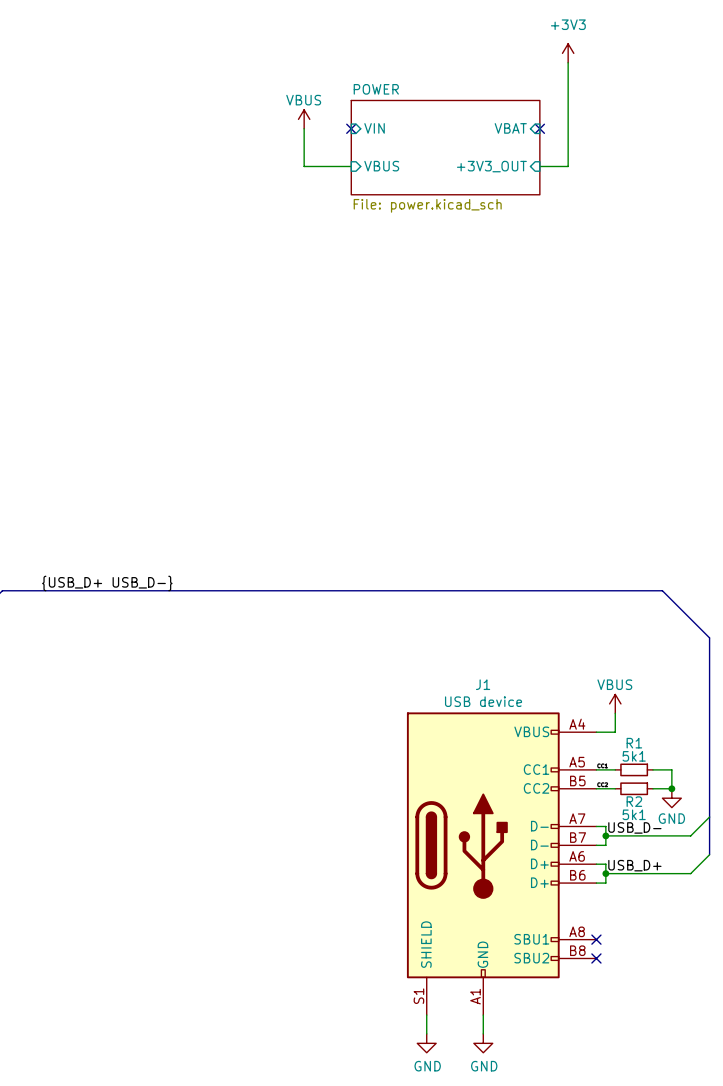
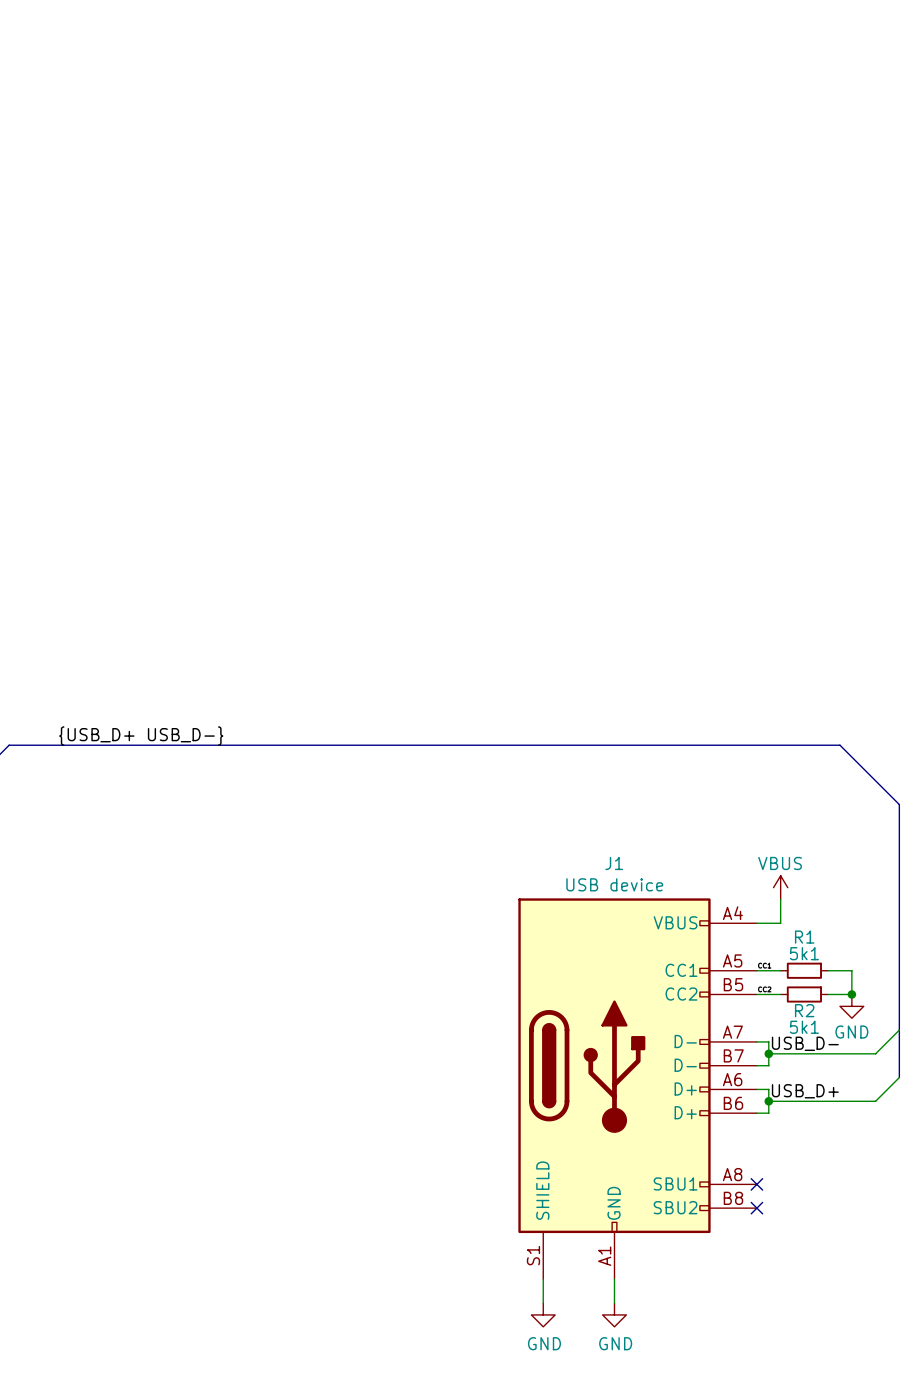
power symbol: +3V3 (568, 53) -> none
wire: (568, 62) (568, 166) (539, 166) -> none
power symbol: VBUS (304, 119) -> none
wire: (304, 128) (304, 166) (351, 166) -> none
no-connect mark: (351, 128) -> none
sheet pin: VIN (374, 128) -> none
sheet pin: VBAT (510, 128) -> none
no-connect mark: (539, 128) -> none
sheet POWER: File: power.kicad_sch (445, 147) -> none
sheet pin: VBUS (381, 166) -> none
sheet pin: +3V3_OUT (491, 166) -> none

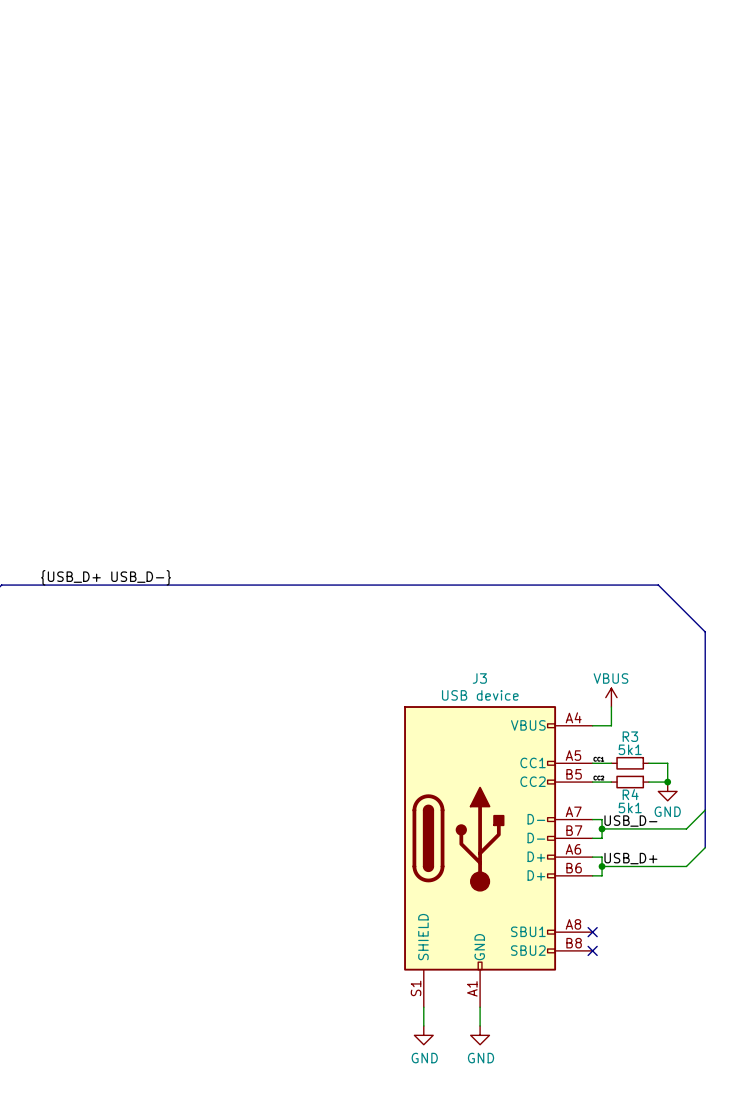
J1 name: J1 (614, 863) -> J3 (479, 678)
R1 name: R1 (804, 937) -> R3 (630, 736)
R2 name: R2 (804, 1010) -> R4 (630, 794)

